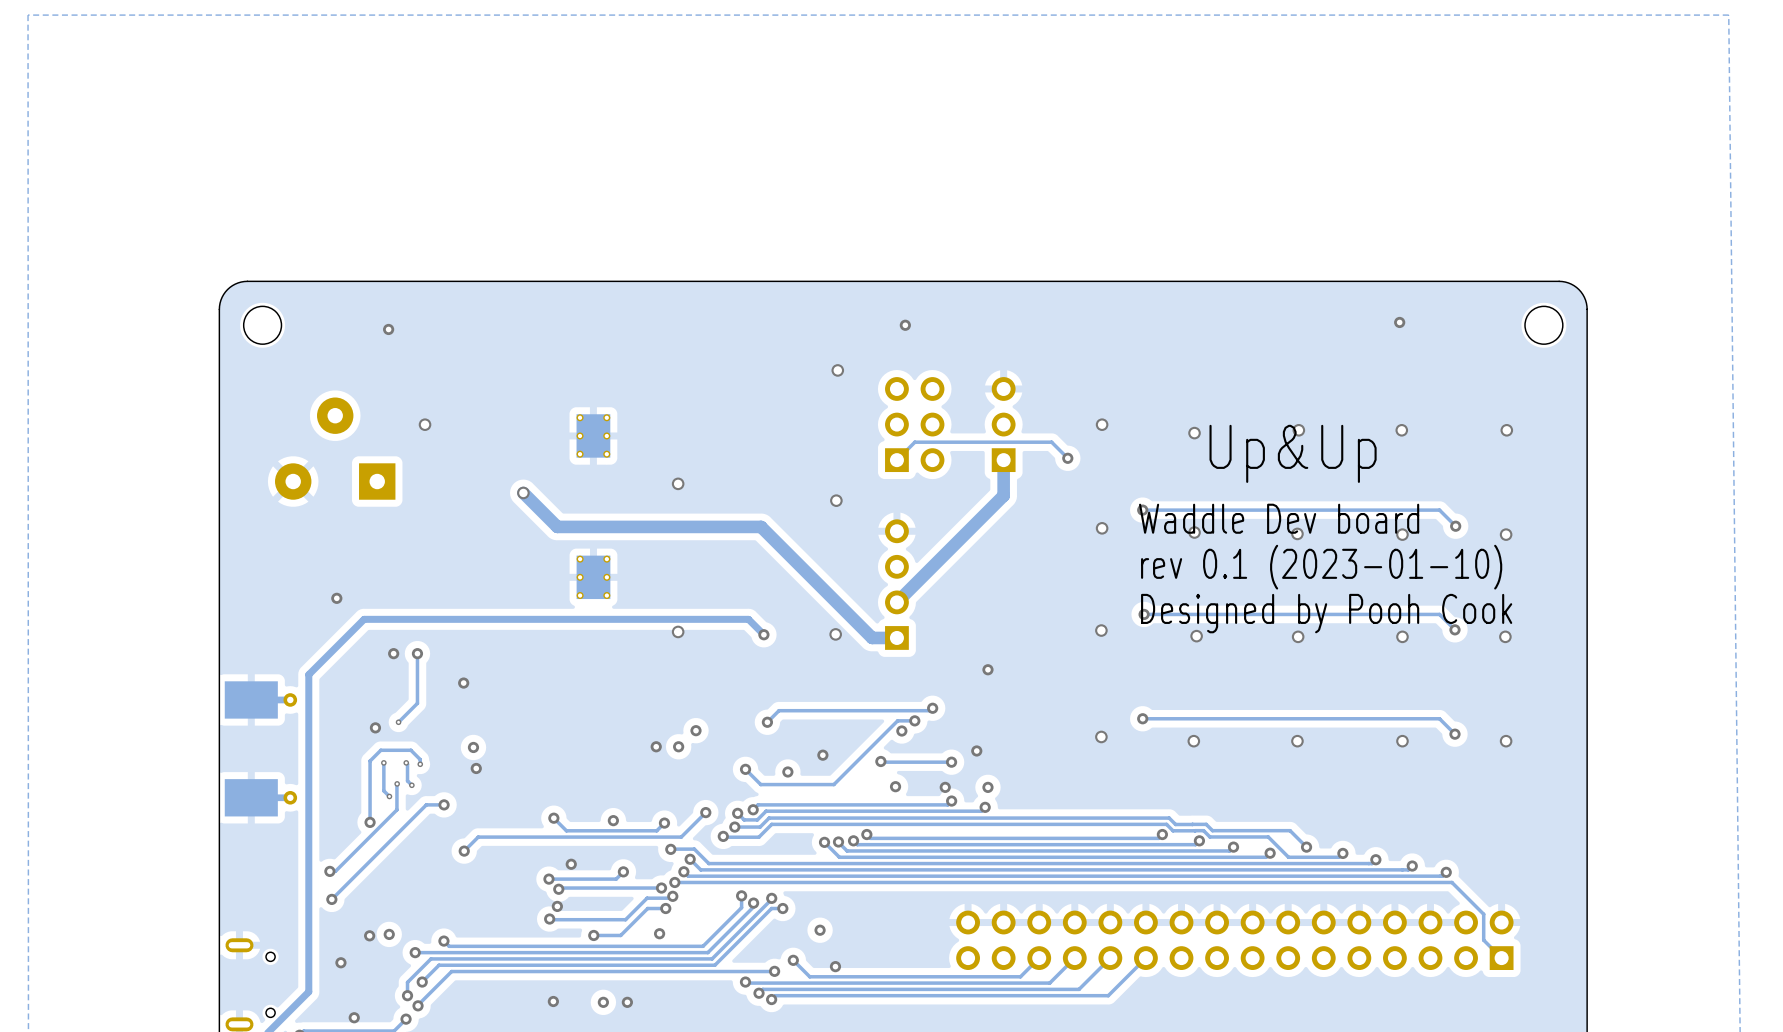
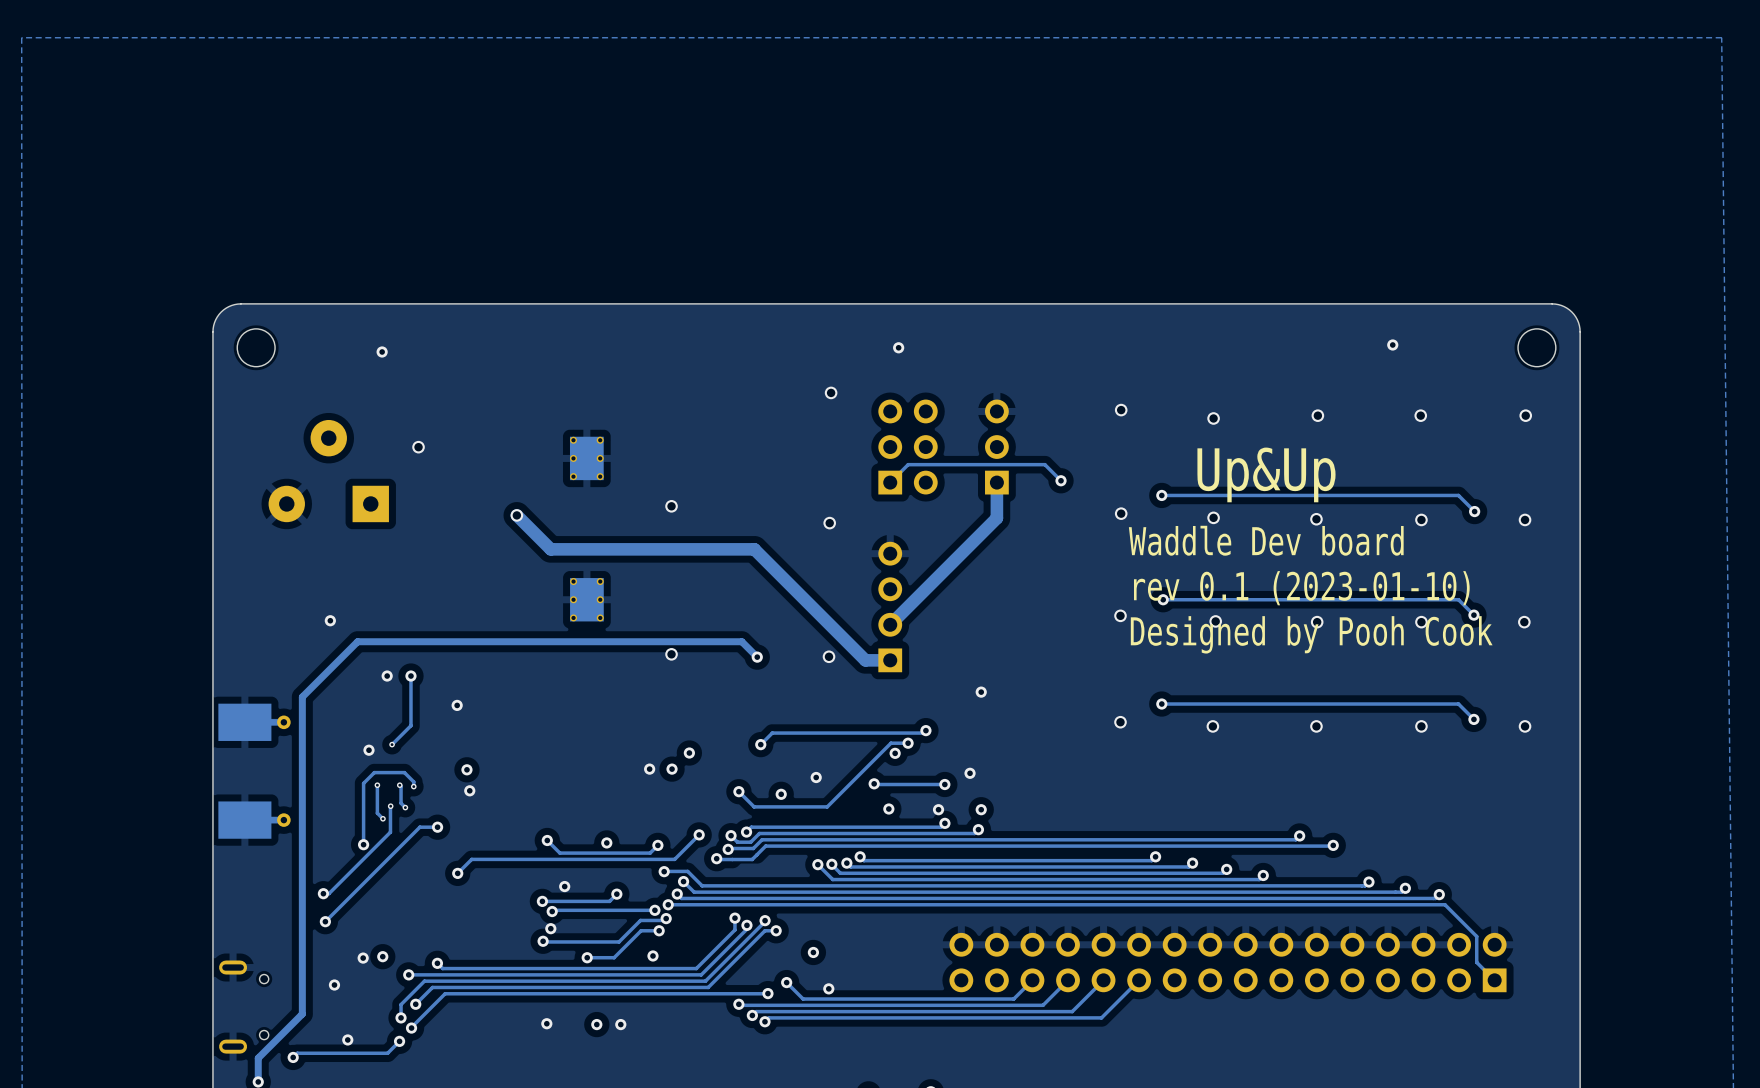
via: none -> (1121, 410)
via: none -> (1317, 415)
via: none -> (1420, 415)
via: none -> (1525, 415)
via: none -> (1213, 418)
via: (1102, 424) -> none
via: (1298, 430) -> none
via: (1401, 430) -> none
via: (1506, 430) -> none
via: (1194, 433) -> none
via: none -> (1161, 495)
via: none -> (1474, 511)
via: none -> (1121, 513)
via: none -> (1213, 517)
via: none -> (1316, 519)
via: none -> (1421, 519)
via: none -> (1525, 519)
track: (1142, 510) (1439, 510) (1455, 526) -> (1161, 495) (1458, 495) (1474, 511)
via: (1142, 510) -> none
via: (1455, 526) -> none
via: (1102, 528) -> none
via: (1194, 532) -> none
via: (1297, 533) -> none
via: (1402, 534) -> none
via: (1506, 534) -> none
via: none -> (1163, 599)
via: none -> (1473, 615)
via: none -> (1120, 615)
via: none -> (1215, 621)
via: none -> (1317, 622)
via: none -> (1421, 622)
via: none -> (1524, 622)
track: (1144, 614) (1439, 614) (1454, 629) -> (1163, 599) (1458, 599) (1473, 615)
via: (1144, 614) -> none
via: (1454, 629) -> none
via: (1101, 630) -> none
via: (1196, 636) -> none
via: (1298, 636) -> none
via: (1402, 636) -> none
via: (1505, 636) -> none
via: none -> (1161, 704)
via: none -> (1473, 719)
via: none -> (1120, 722)
via: none -> (1212, 726)
via: none -> (1316, 726)
via: none -> (1421, 726)
via: none -> (1525, 726)
track: (1142, 718) (1439, 718) (1454, 734) -> (1161, 704) (1458, 704) (1473, 719)
via: (1142, 718) -> none
via: (1454, 734) -> none
via: (1101, 736) -> none
via: (1193, 741) -> none
via: (1297, 741) -> none
via: (1402, 741) -> none
via: (1506, 741) -> none
via: none -> (1299, 835)
via: none -> (1333, 845)
track: (771, 824) (1166, 824) (1173, 830) (1195, 830) -> (765, 846) (1333, 845)
track: (1192, 824) (1175, 824) (1169, 818) (769, 818) (760, 827) (734, 827) -> (1299, 835) (1295, 839) (762, 839) (753, 848) (728, 849)
track: (1192, 824) (1206, 824) (1212, 830) (1290, 830) (1306, 847) -> none
track: (1195, 830) (1203, 830) (1209, 836) (1268, 836) (1288, 857) (1339, 857) (1342, 853) -> none
via: (1306, 847) -> none
via: (1342, 853) -> none

